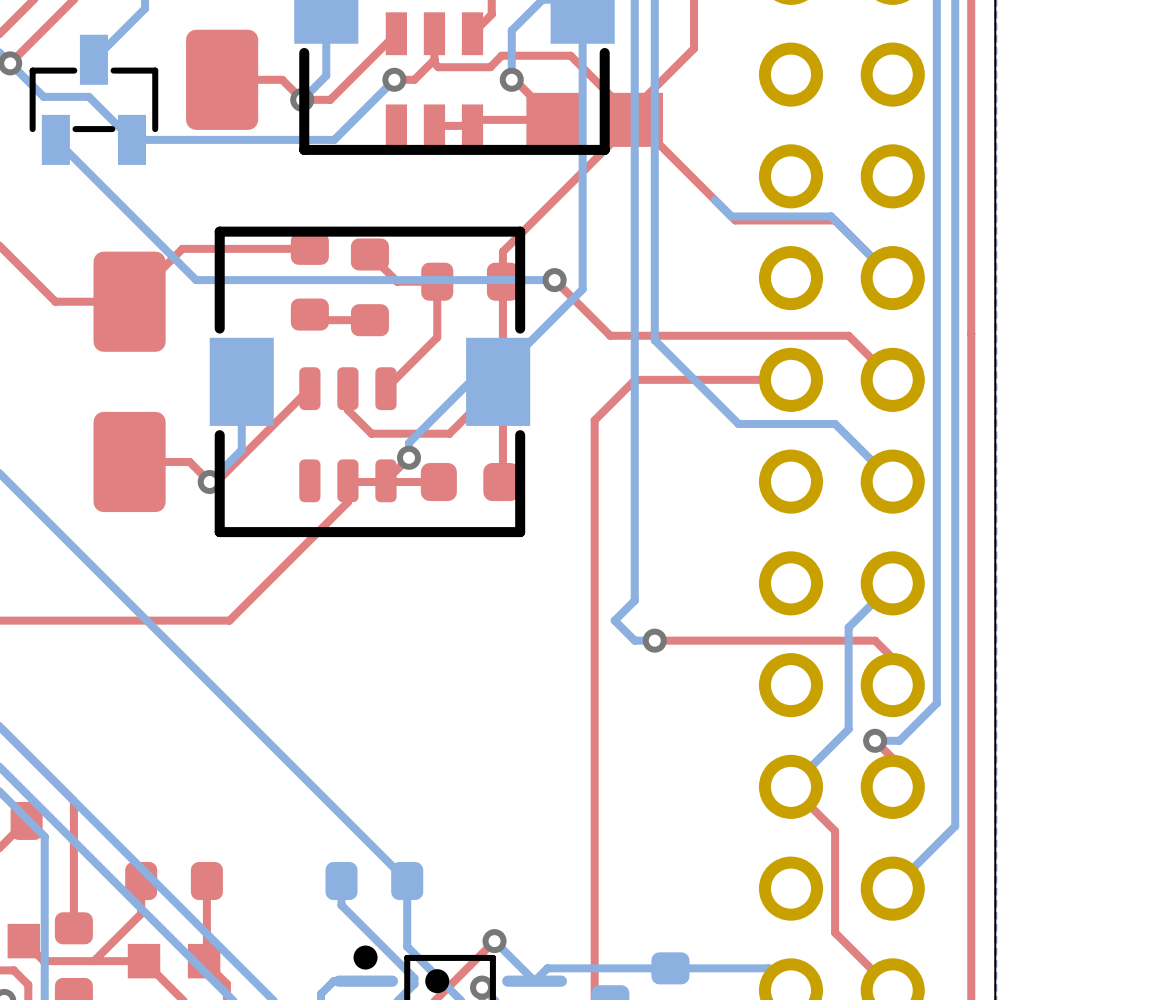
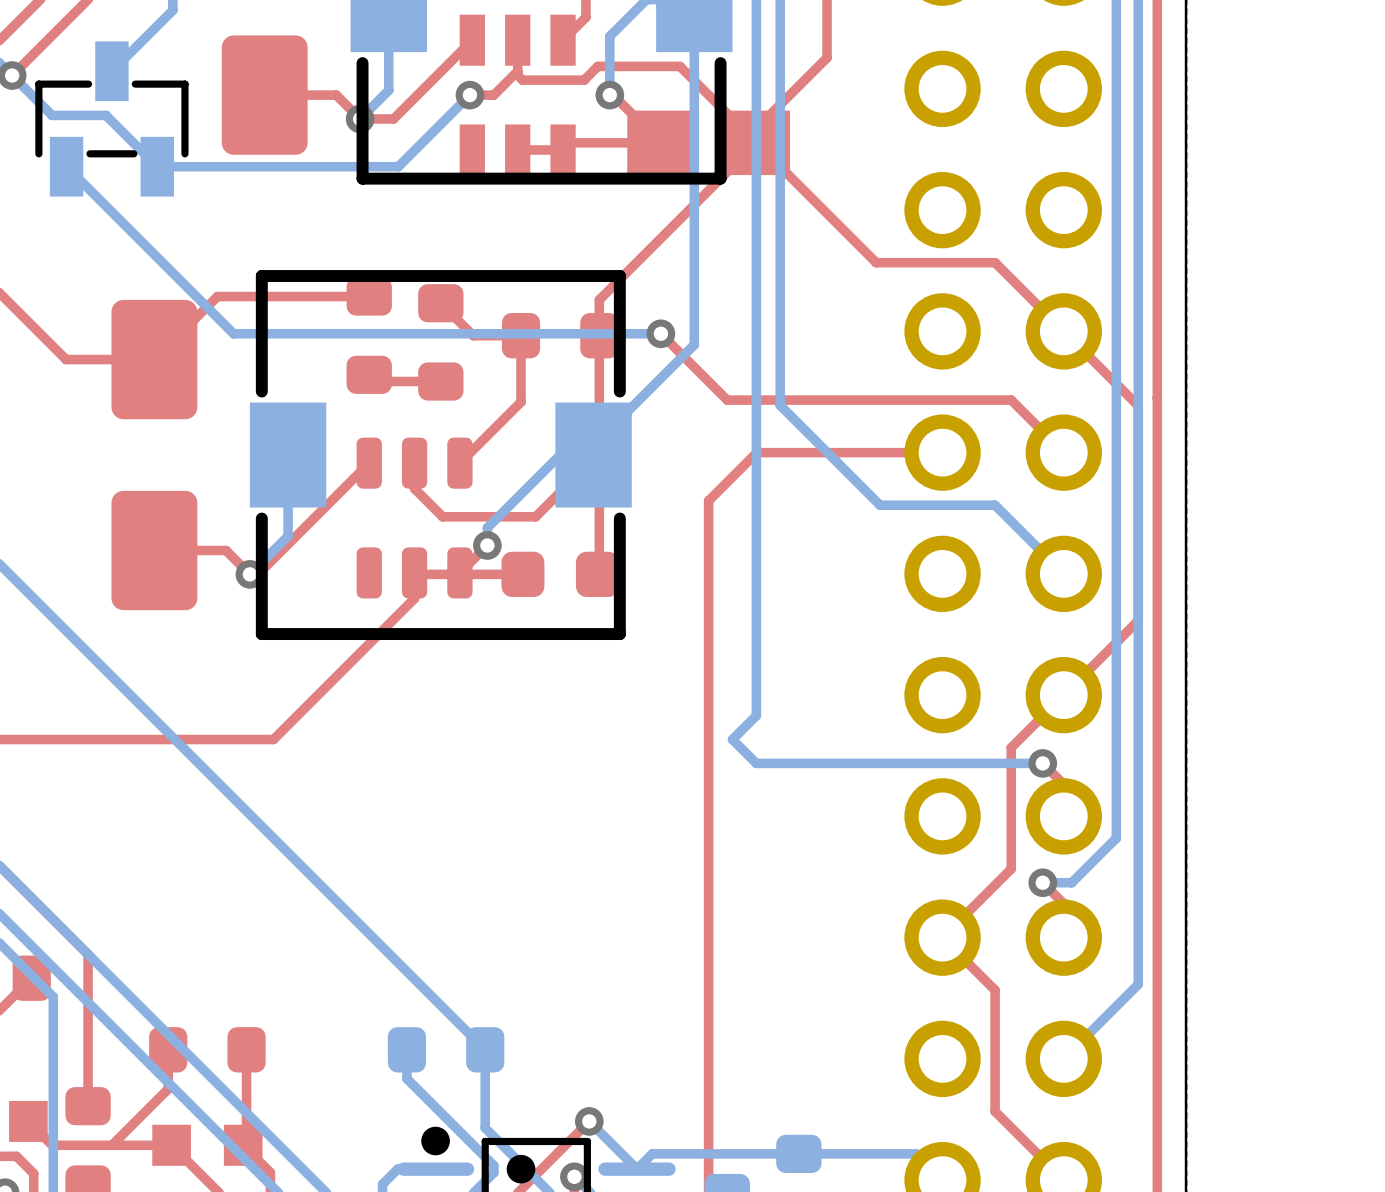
bottom track: (714, 199) (731, 216) (831, 216) (892, 278) -> none
top track: none -> (1063, 331) (1138, 405) (1138, 620) (1011, 747) (1011, 868) (942, 937)
bottom track: (892, 583) (848, 627) (848, 729) (790, 786) -> none
via position: (654, 640) -> (1042, 763)
top track: (875, 640) (654, 640) -> none
bottom track: none -> (1042, 763) (780, 763)

